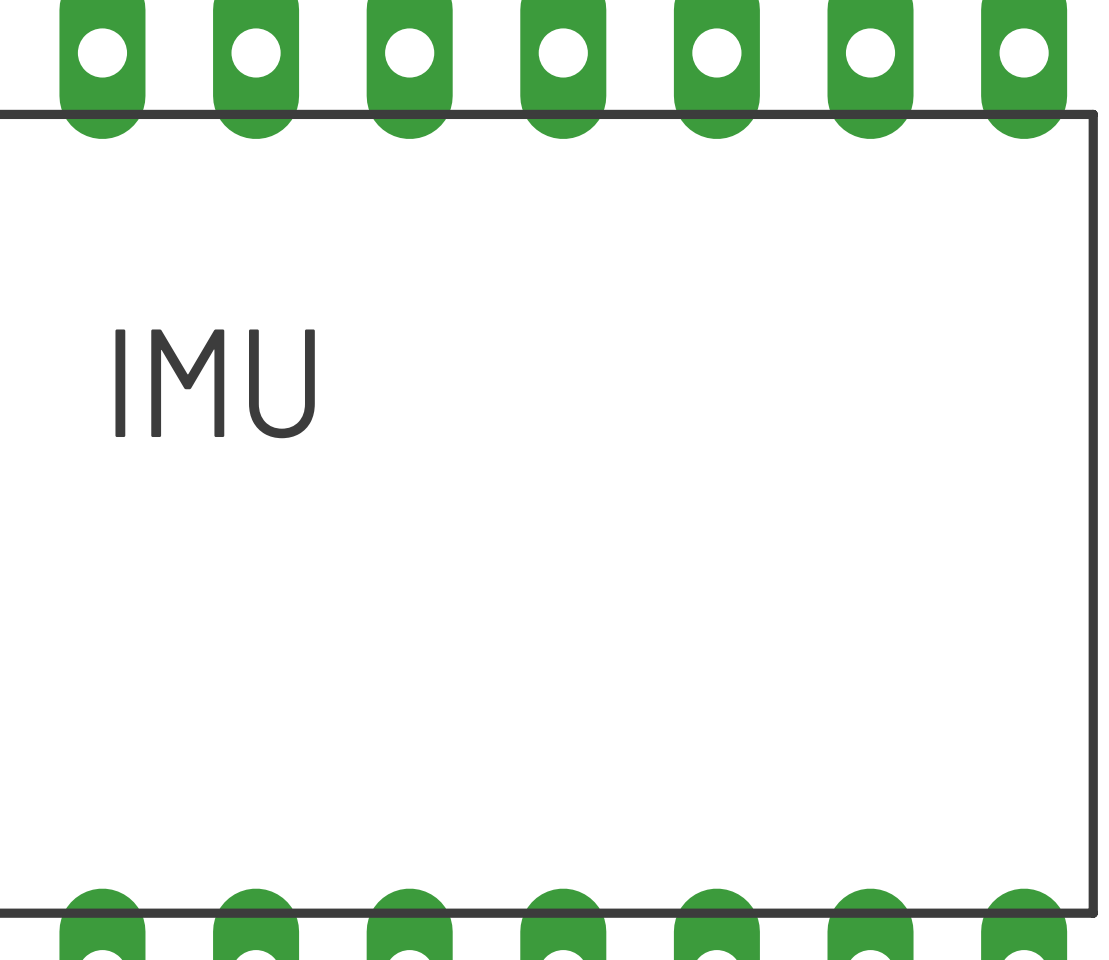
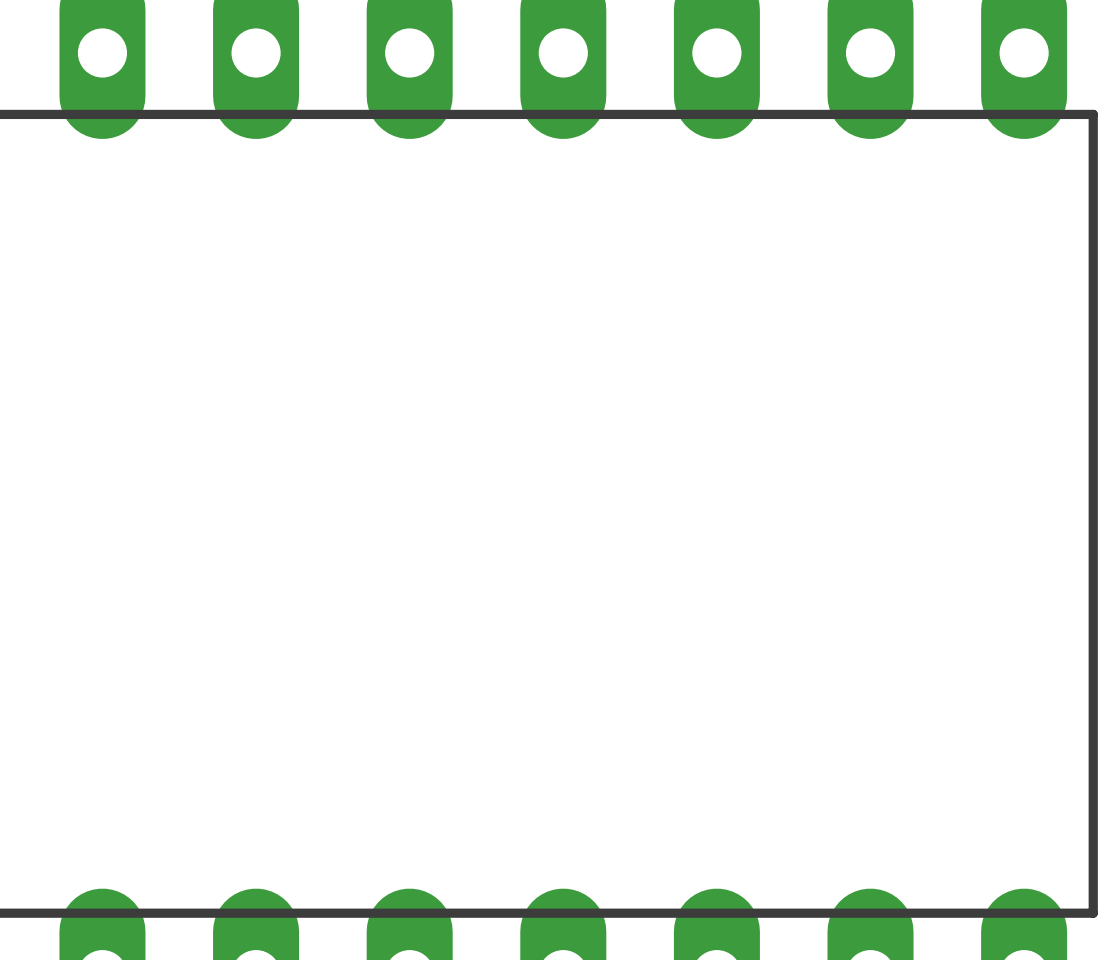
text: IMU (215, 383) -> none

